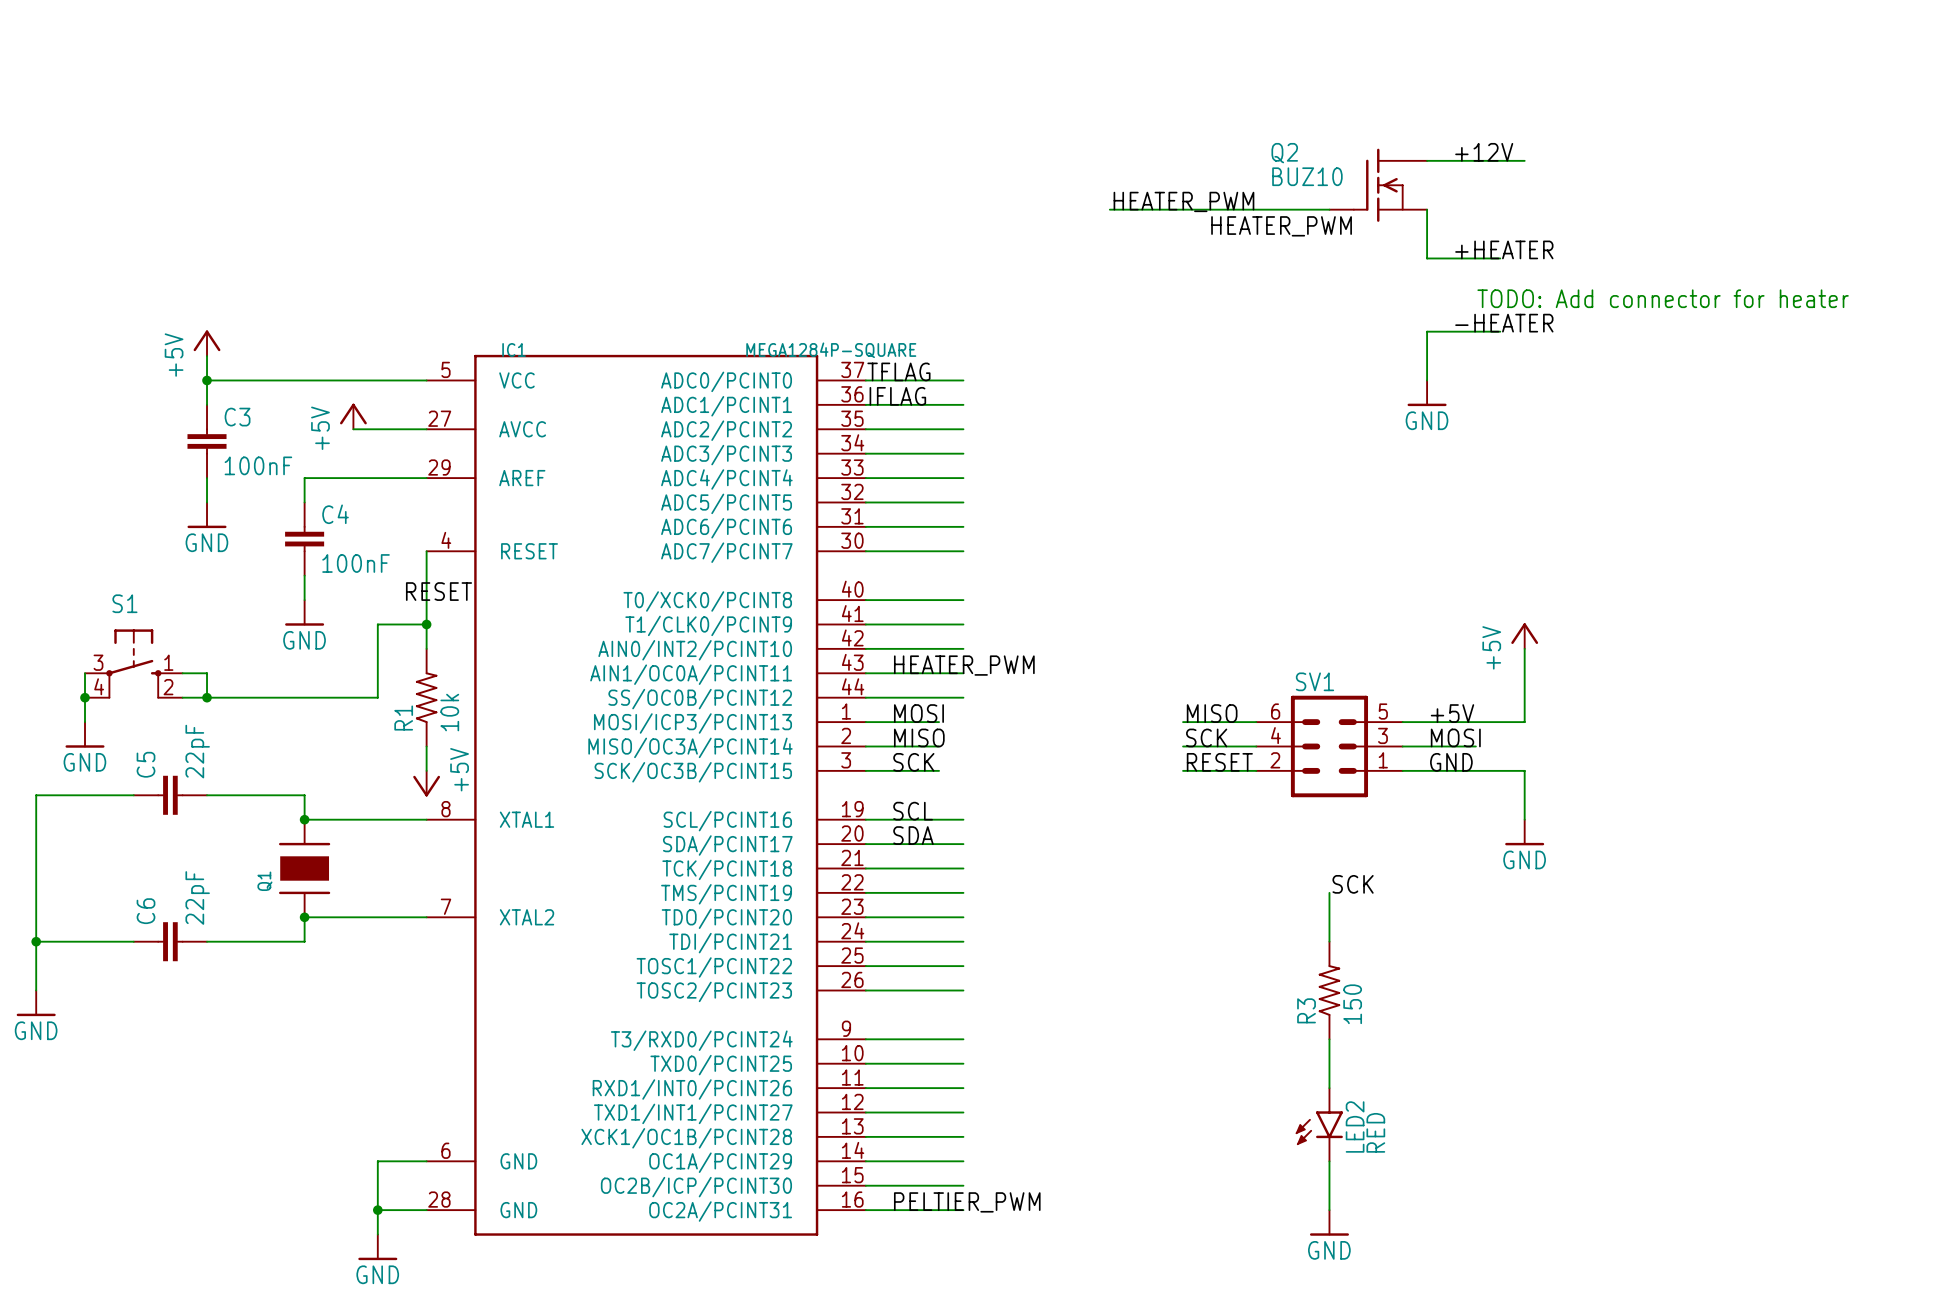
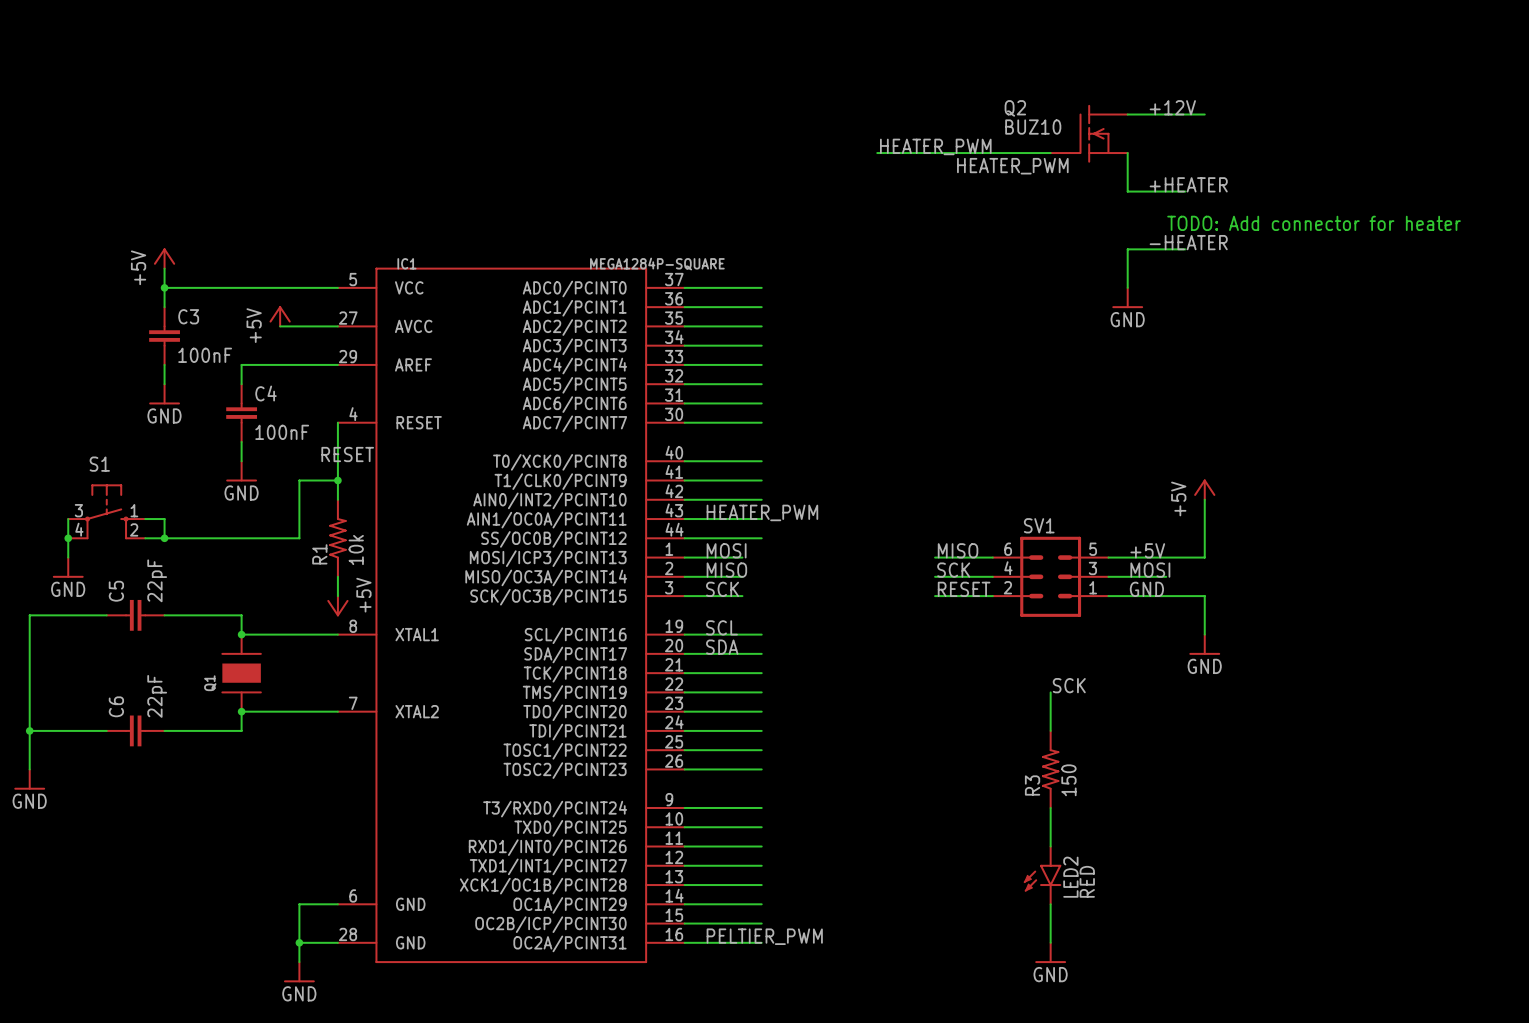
label: TFLAG (898, 371) -> none
label: IFLAG (897, 396) -> none

